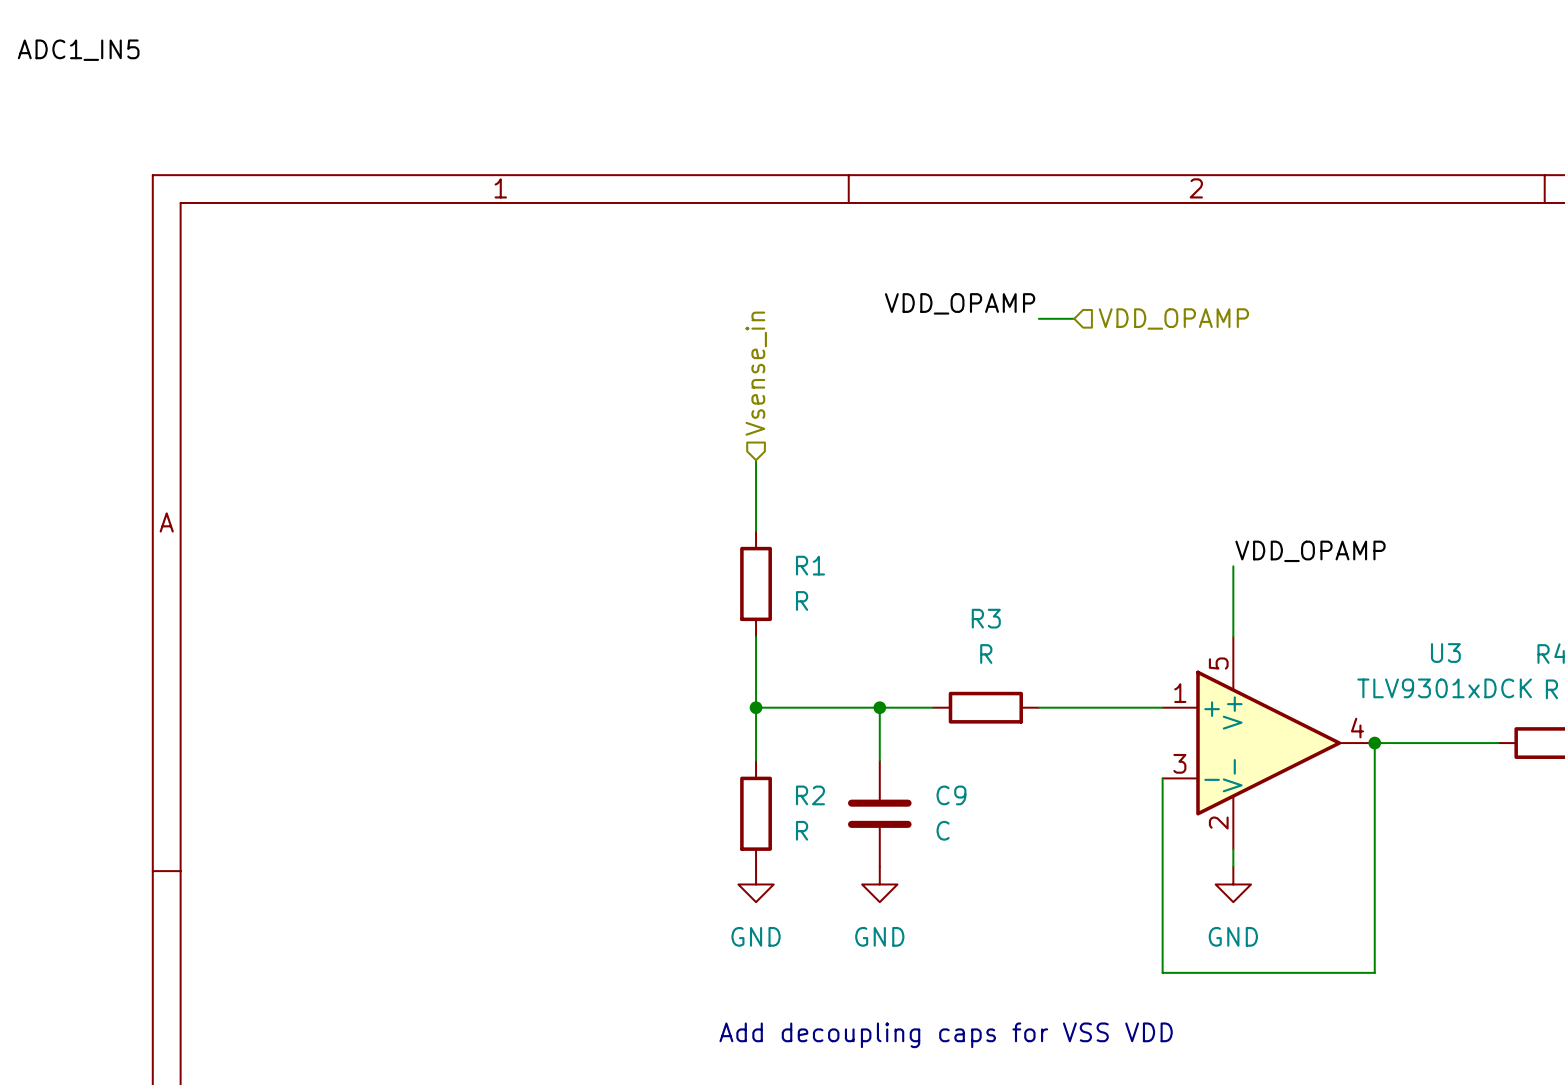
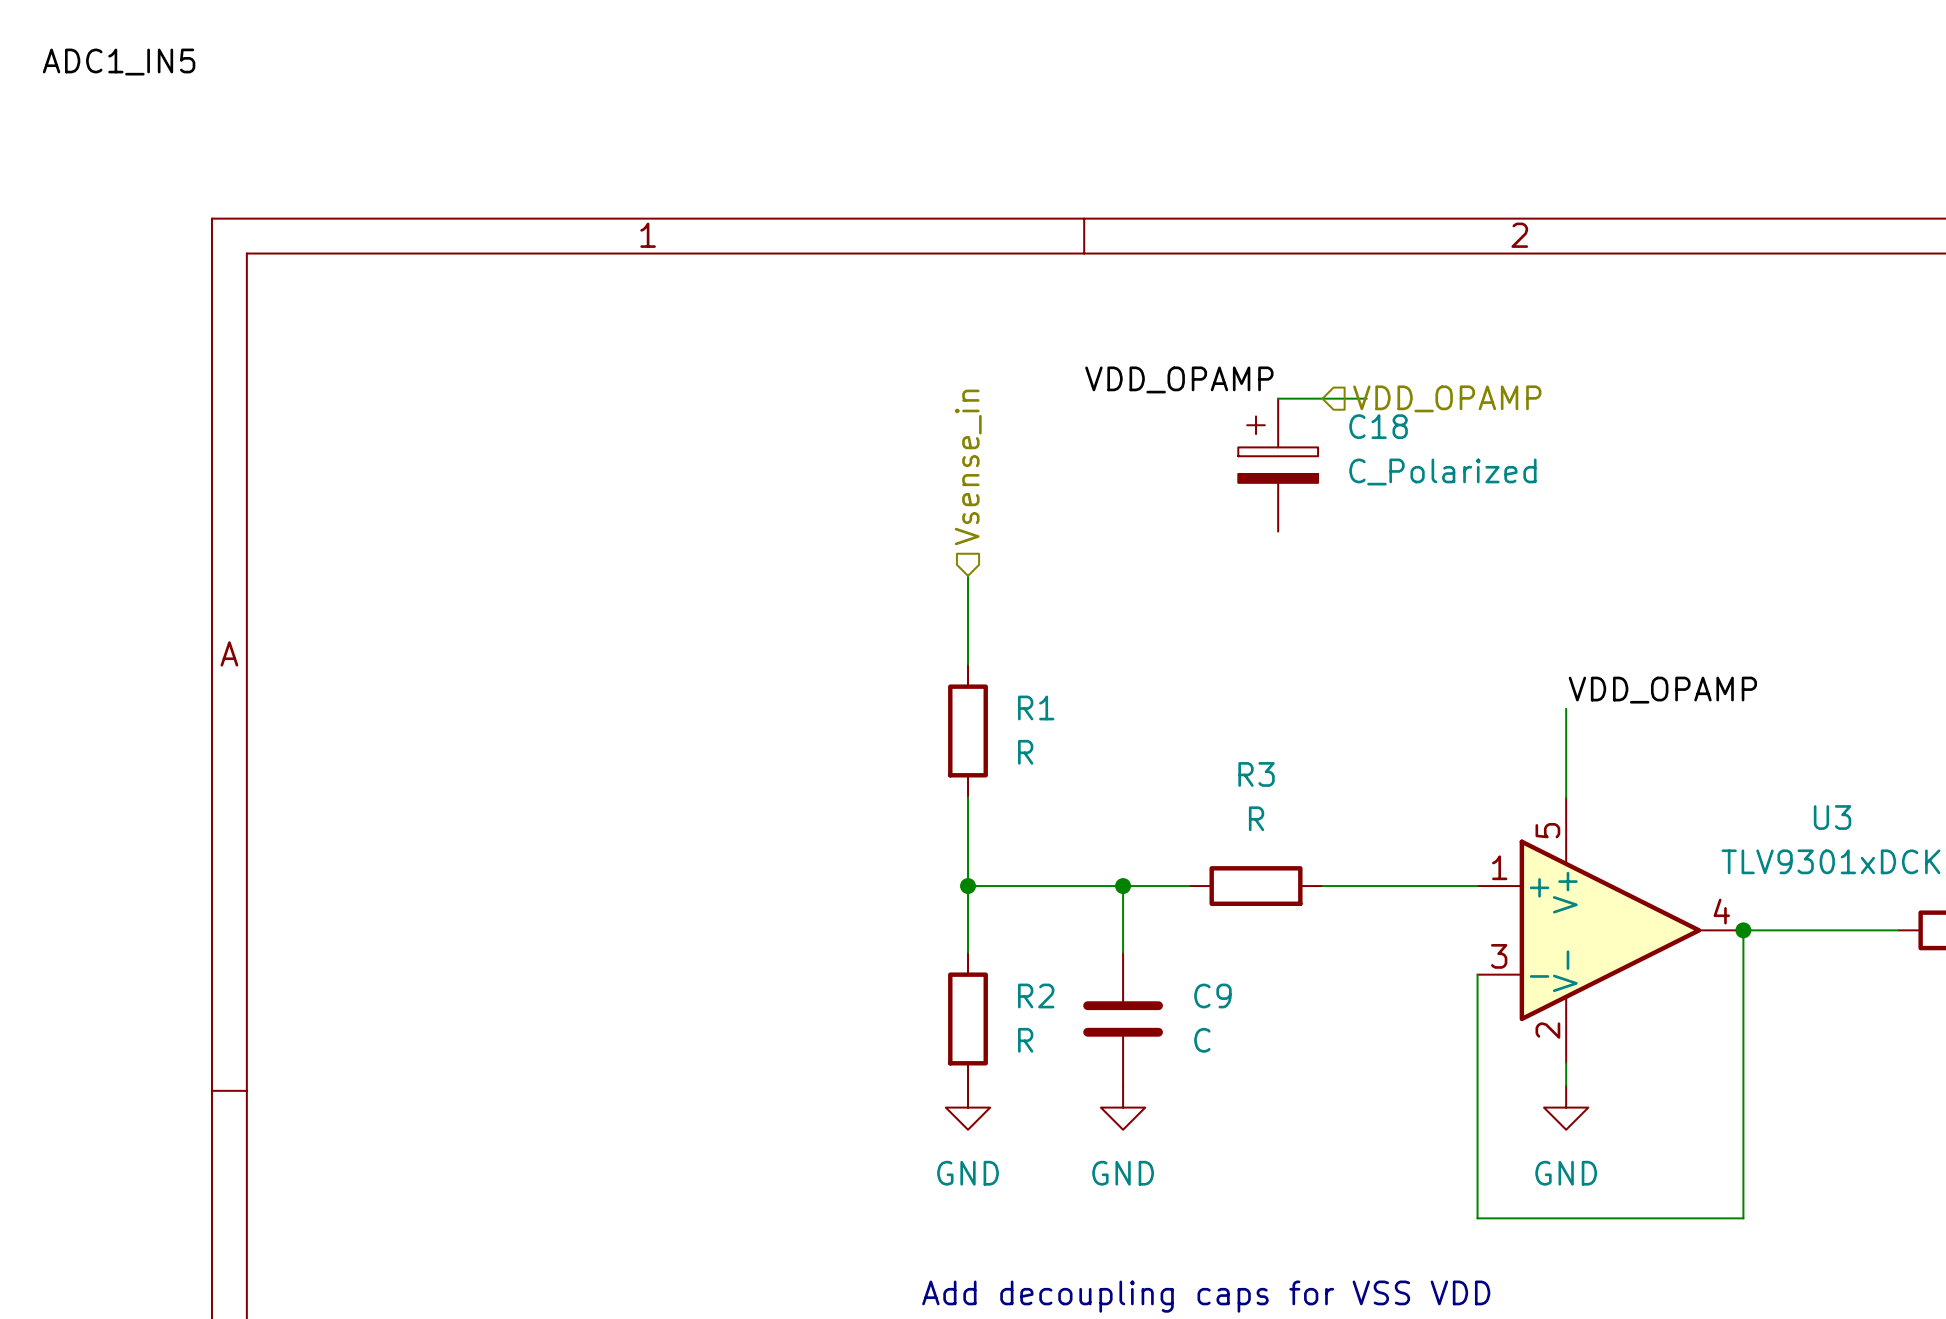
label position: VDD_OPAMP (960, 303) -> VDD_OPAMP (1179, 379)
wire: none -> (1278, 398) (1322, 398)
hierarchical label position: VDD_OPAMP (1173, 318) -> VDD_OPAMP (1447, 398)
C18: none -> C_Polarized (1278, 465)

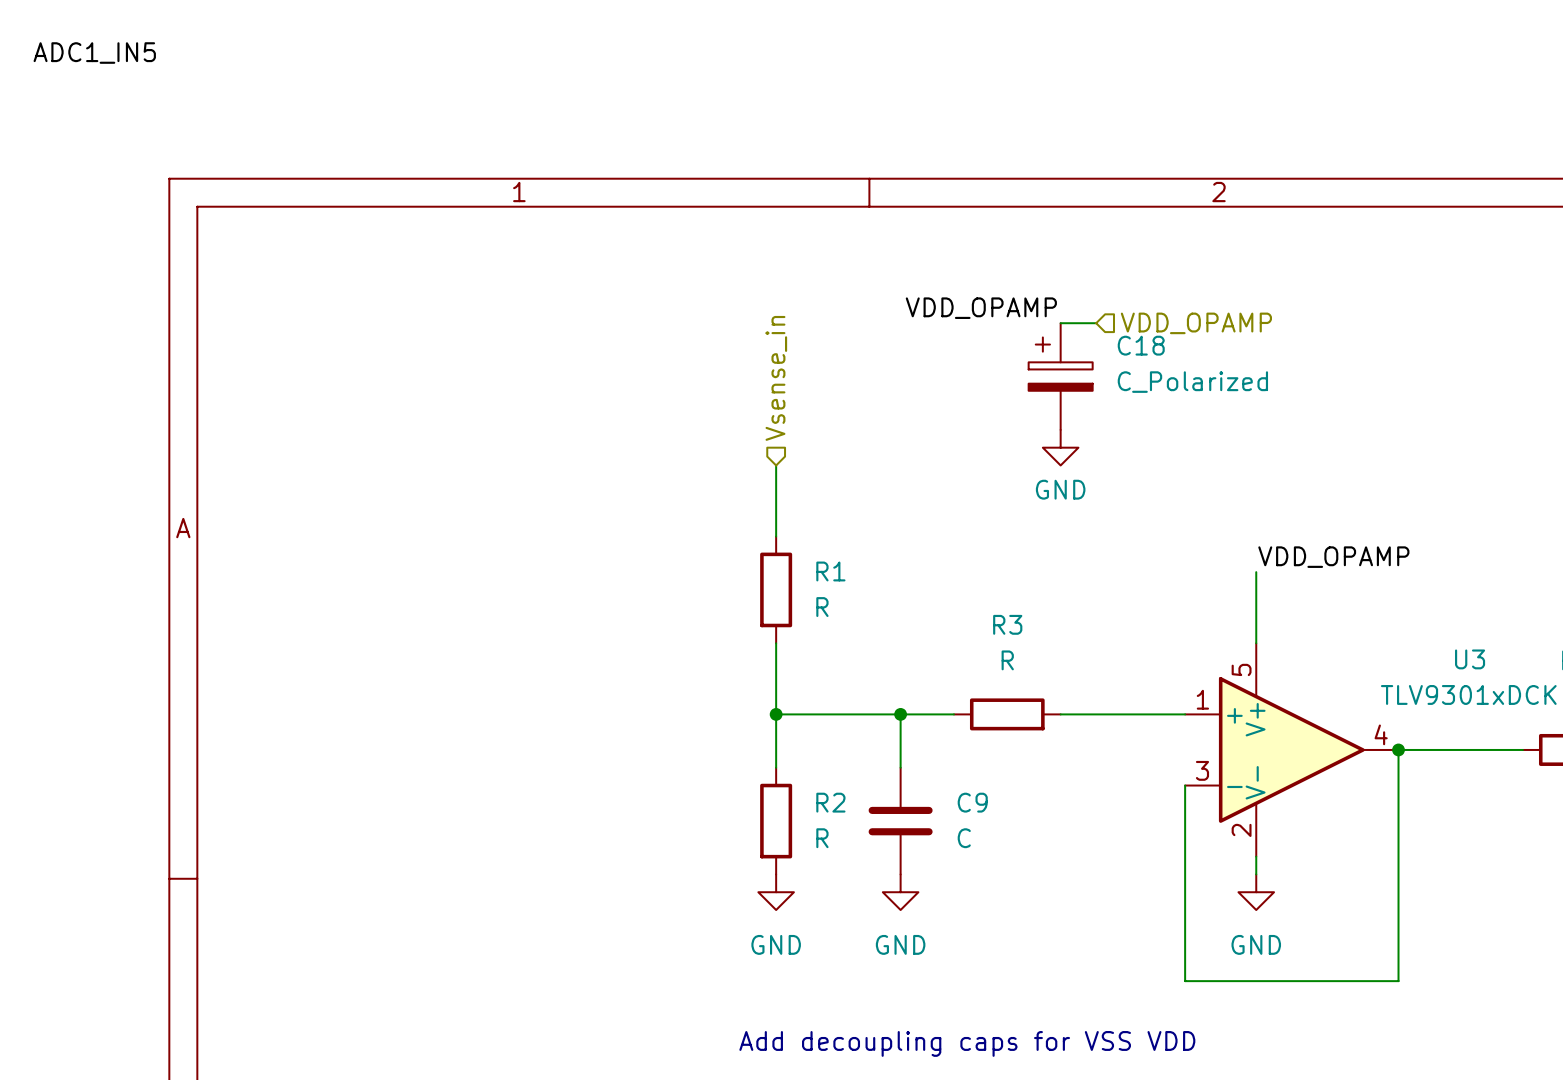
label position: VDD_OPAMP (1179, 379) -> VDD_OPAMP (981, 308)
wire: (1278, 398) (1322, 398) -> none
hierarchical label position: VDD_OPAMP (1447, 398) -> VDD_OPAMP (1196, 323)
C18 position: (1278, 465) -> (1060, 376)
power symbol: none -> GND (1060, 447)

